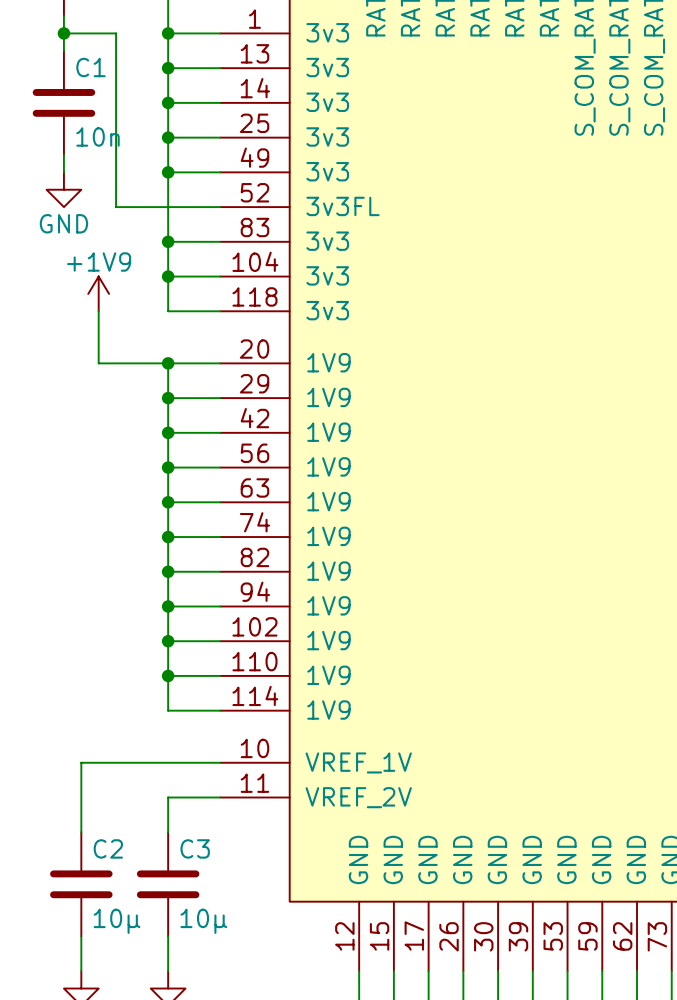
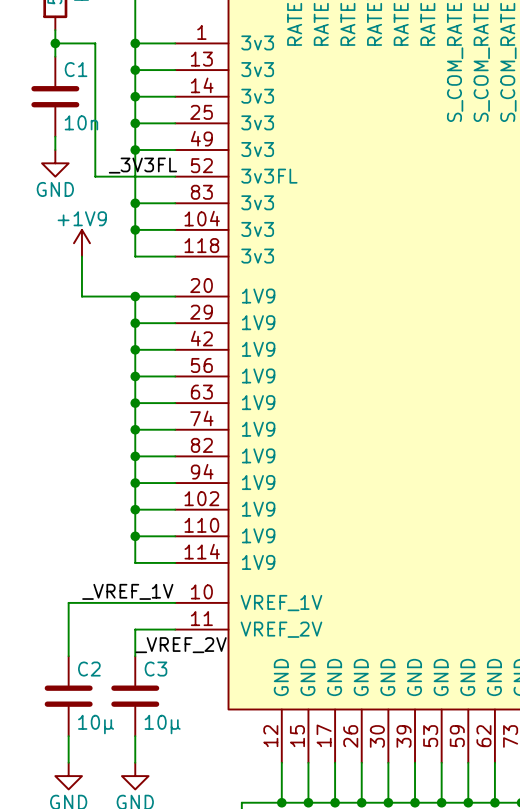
label: none -> _3V3FL (142, 165)
label: none -> _VREF_1V (127, 591)
label: none -> _VREF_2V (181, 645)

